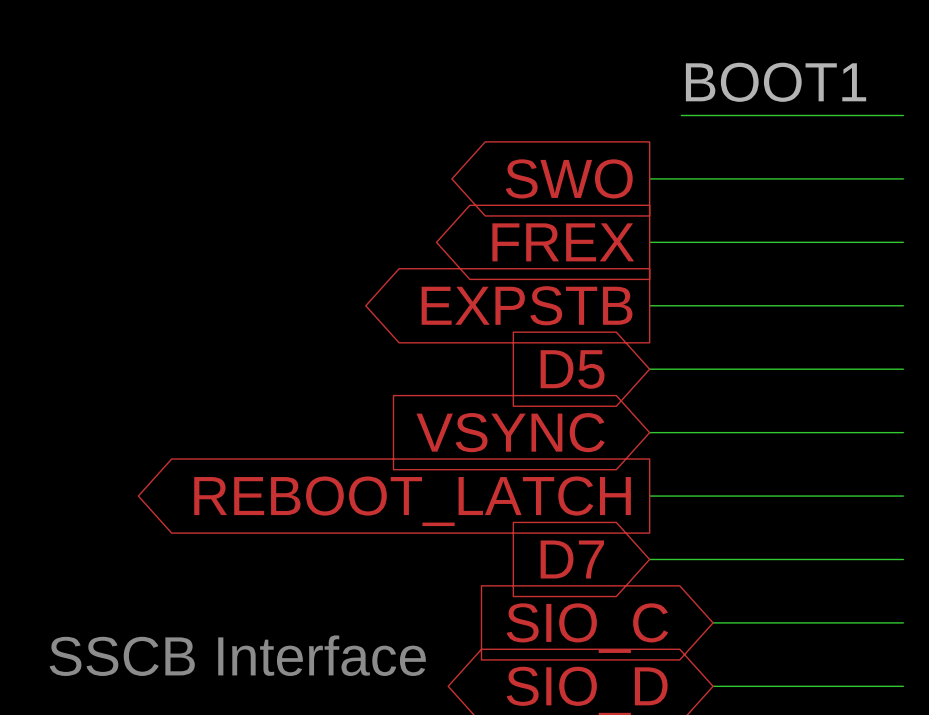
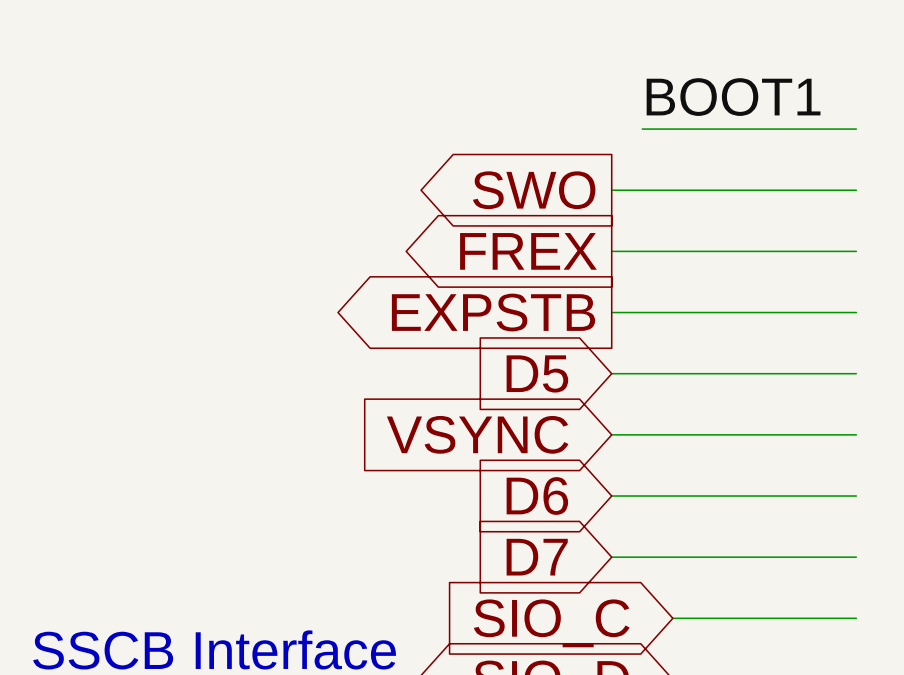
global label shape: output (412, 501) -> input (537, 496)
global label: REBOOT_LATCH (412, 501) -> D6 (537, 496)

